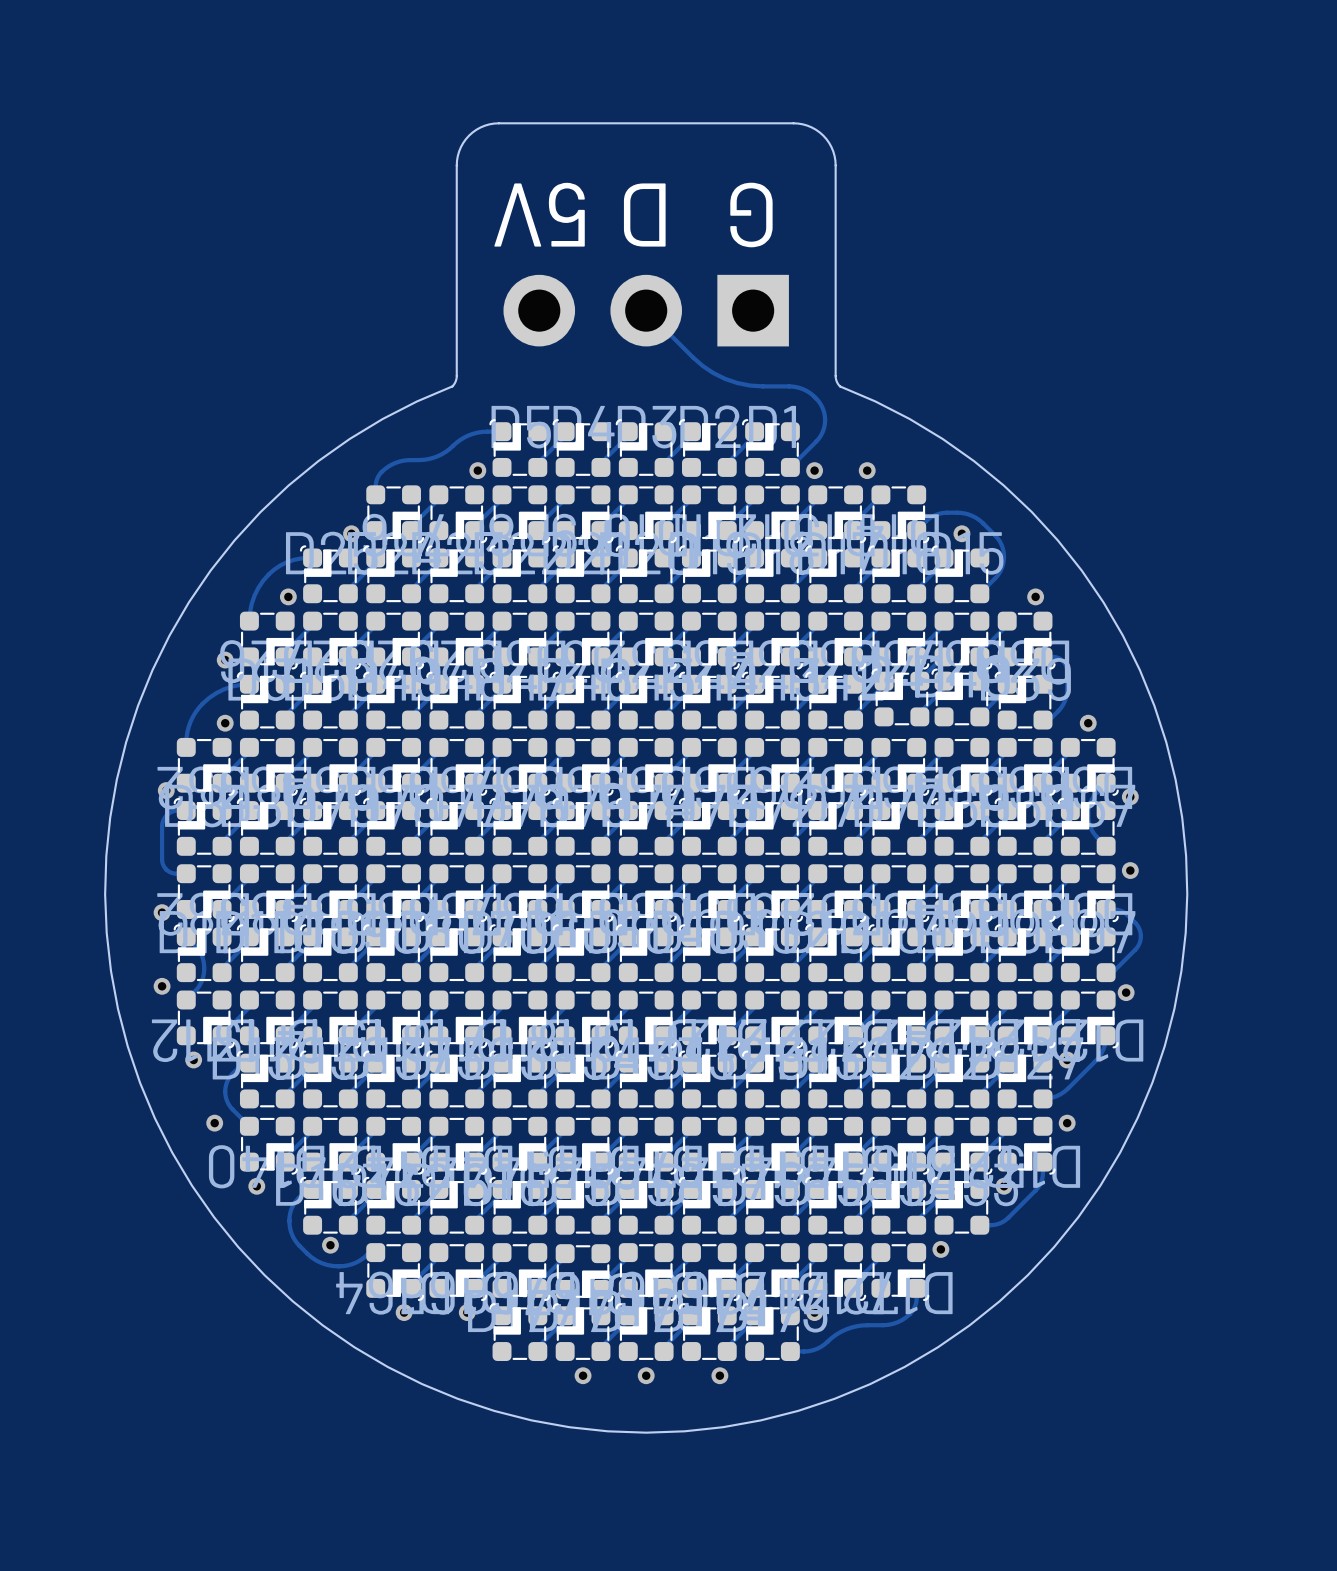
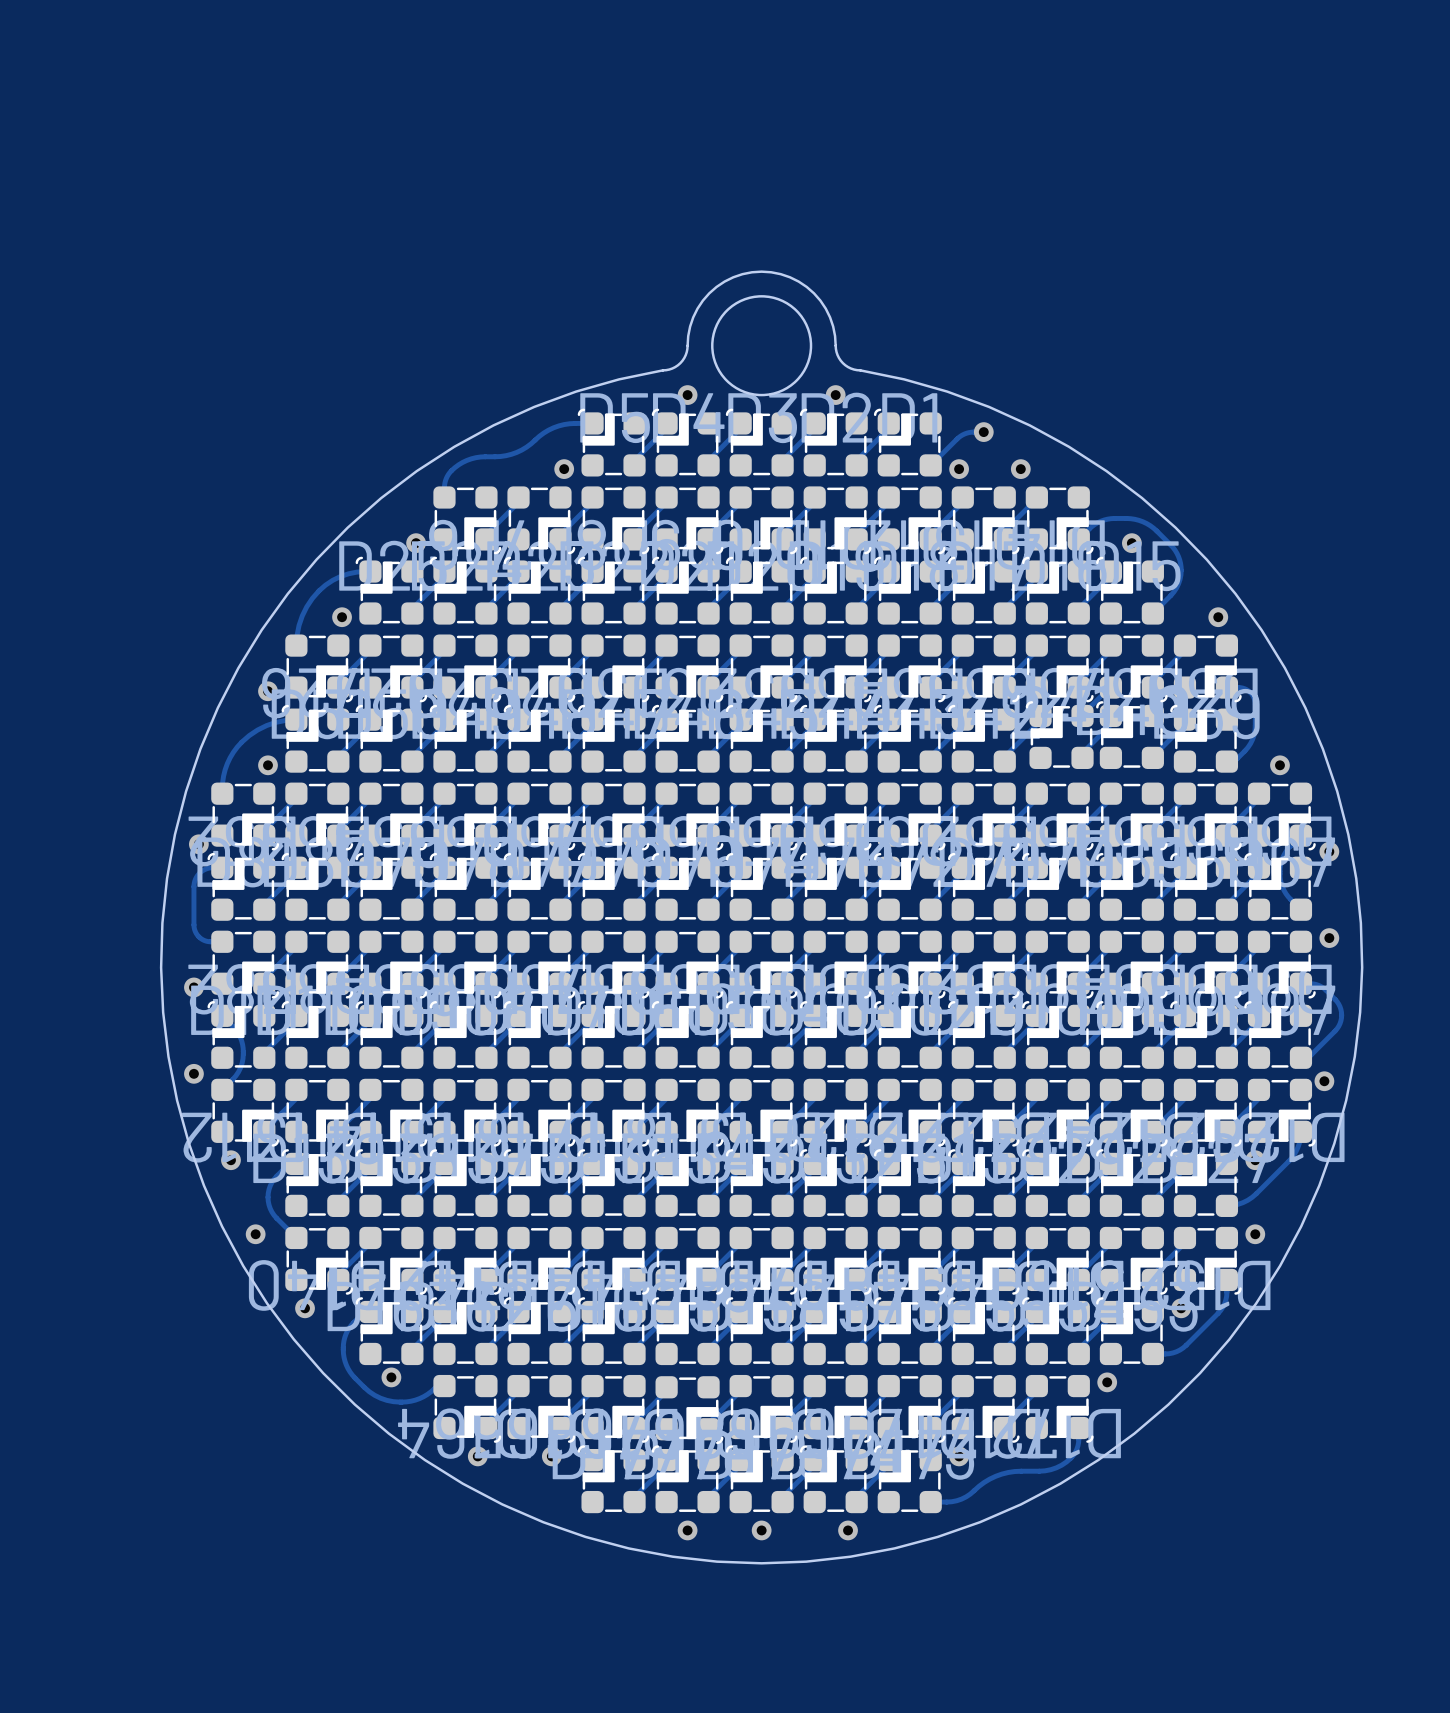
board edge: (498, 123) (793, 123) (811, 127) (823, 135) (831, 147) (835, 160) (835, 375) (837, 382) (840, 386) (909, 419) (974, 461) (1031, 512) (1057, 540) (1103, 602) (1122, 635) (1154, 705) (1175, 779) (1186, 855) (1187, 894) (1185, 932) (1174, 1009) (1152, 1082) (1120, 1152) (1100, 1185) (1054, 1247) (1027, 1275) (969, 1325) (937, 1347) (870, 1384) (798, 1410) (760, 1420) (684, 1431) (646, 1432) (569, 1427) (531, 1420) (457, 1398) (387, 1366) (354, 1347) (292, 1301) (264, 1275) (214, 1217) (172, 1152) (154, 1118) (127, 1046) (118, 1009) (106, 932) (105, 894) (110, 817) (126, 742) (152, 670) (169, 635) (210, 570) (260, 512) (318, 461) (349, 438) (382, 419) (454, 384) (456, 375) (457, 156) (463, 142) (472, 132) (484, 125) (498, 123) -> (687, 345) (682, 360) (672, 368) (619, 379) (576, 391) (534, 406) (493, 425) (454, 446) (416, 471) (381, 498) (347, 527) (316, 559) (287, 593) (261, 630) (238, 668) (217, 707) (200, 749) (186, 791) (174, 834) (167, 878) (162, 923) (161, 967) (163, 1012) (168, 1056) (177, 1100) (188, 1143) (203, 1185) (222, 1226) (243, 1265) (267, 1303) (293, 1339) (323, 1373) (354, 1404) (388, 1433) (424, 1460) (462, 1483) (502, 1504) (543, 1522) (585, 1536) (628, 1548) (672, 1556) (717, 1561) (761, 1563) (806, 1561) (850, 1556) (894, 1548) (937, 1536) (979, 1522) (1020, 1504) (1060, 1483) (1098, 1460) (1134, 1433) (1168, 1404) (1200, 1373) (1229, 1339) (1256, 1303) (1280, 1265) (1301, 1226) (1319, 1185) (1334, 1143) (1346, 1100) (1354, 1056) (1360, 1012) (1362, 967) (1360, 923) (1356, 878) (1348, 834) (1337, 791) (1322, 749) (1305, 707) (1284, 668) (1261, 630) (1235, 593) (1206, 559) (1175, 527) (1142, 498) (1106, 471) (1068, 446) (1029, 425) (989, 406) (947, 391) (904, 379) (848, 367) (837, 355) (833, 326) (820, 300) (798, 281) (780, 274) (751, 272) (733, 277) (716, 286) (702, 300) (693, 317) (687, 345)
text: 5V (539, 214) -> none
text: D (644, 215) -> none
text: G (751, 215) -> none
track: (646, 310) (692, 357) (713, 373) (737, 383) (750, 385) (796, 387) (811, 394) (821, 404) (825, 420) (822, 431) (812, 444) -> (983, 432) (966, 433) (957, 439)
part: (646, 310) -> none
round board edge: none -> [711, 295, 813, 397]
via: none -> (687, 395)
via: none -> (835, 395)
via: none -> (983, 432)

